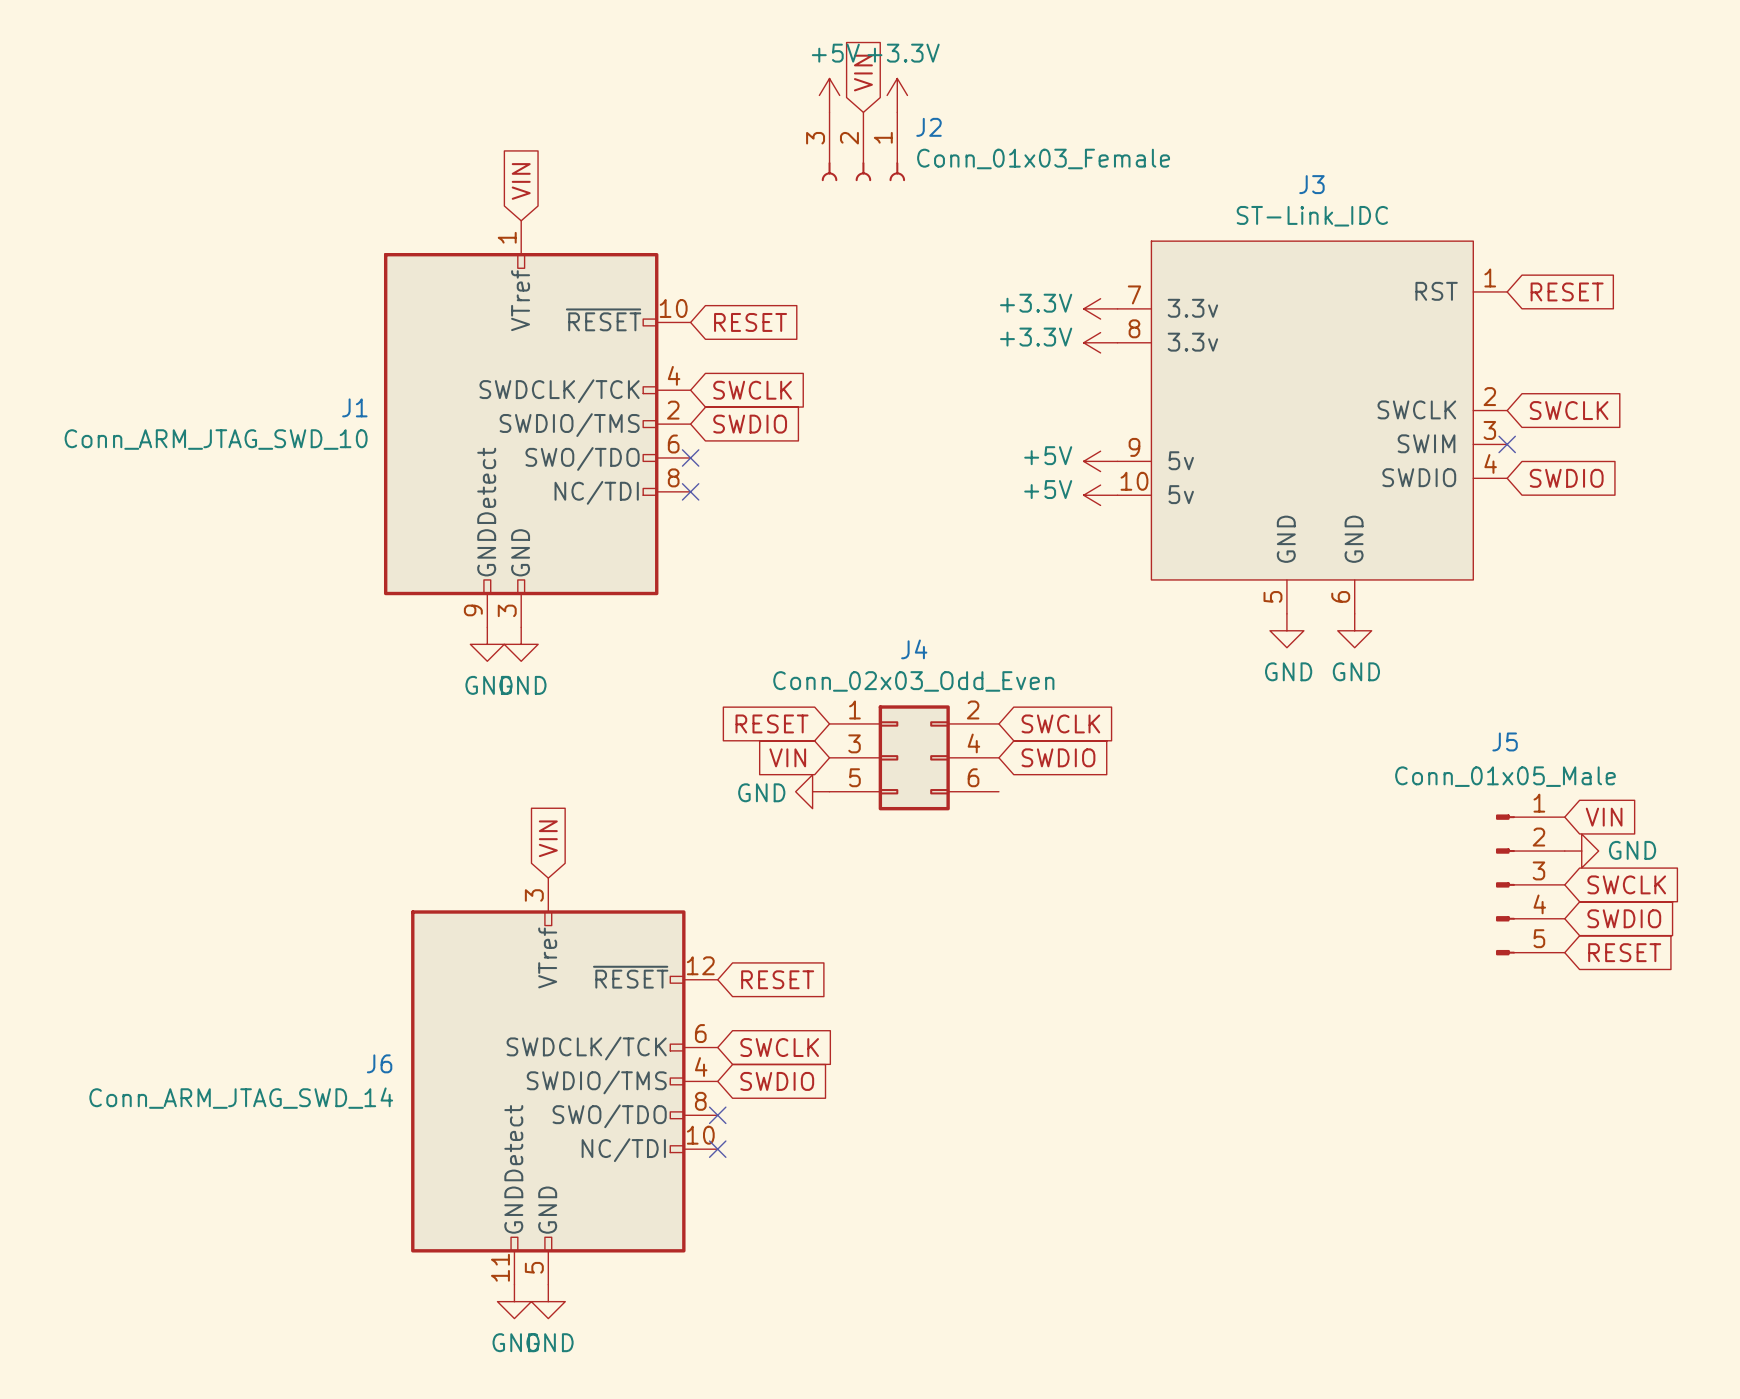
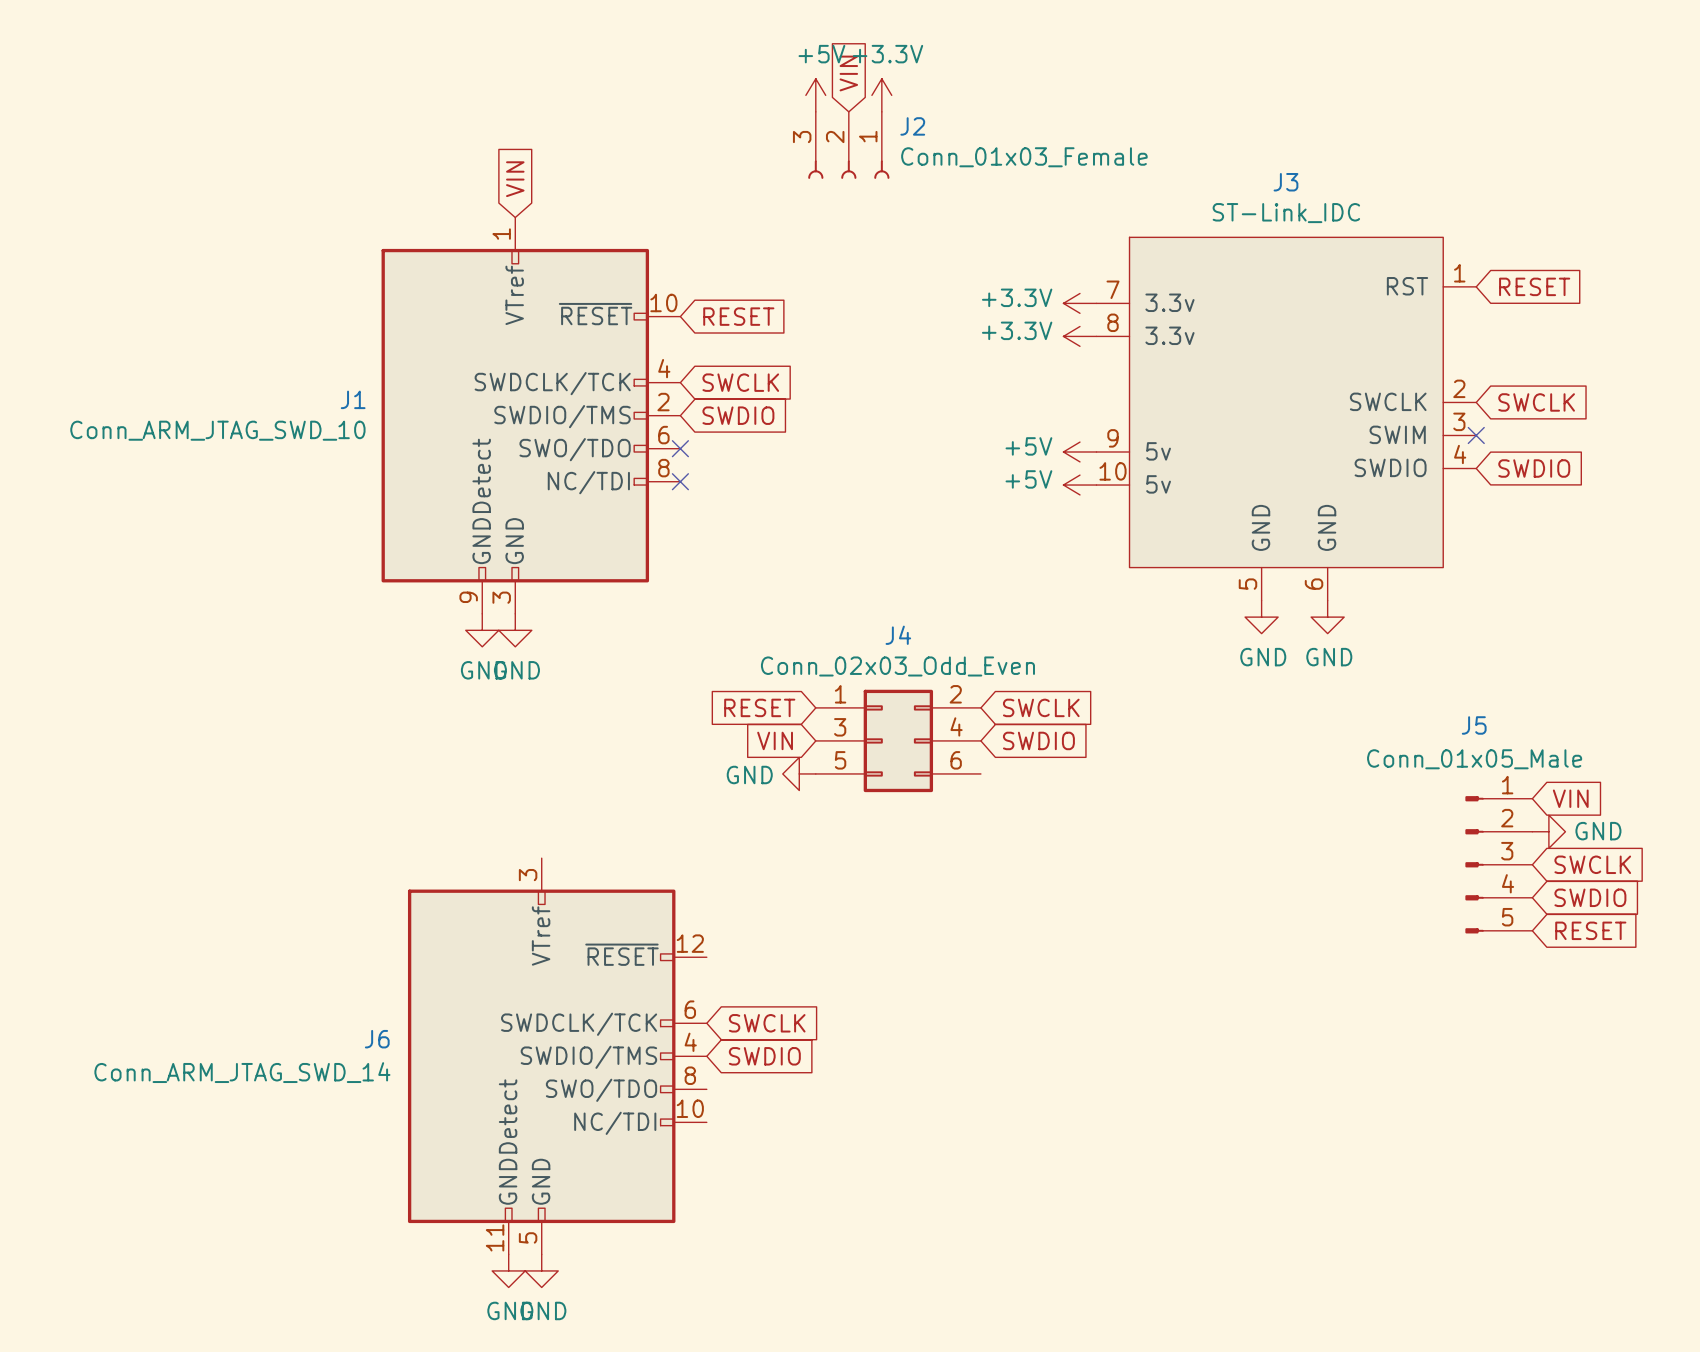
global label: VIN (548, 838) -> none
global label: RESET (777, 979) -> none
no-connect mark: (717, 1115) -> none
no-connect mark: (717, 1149) -> none

